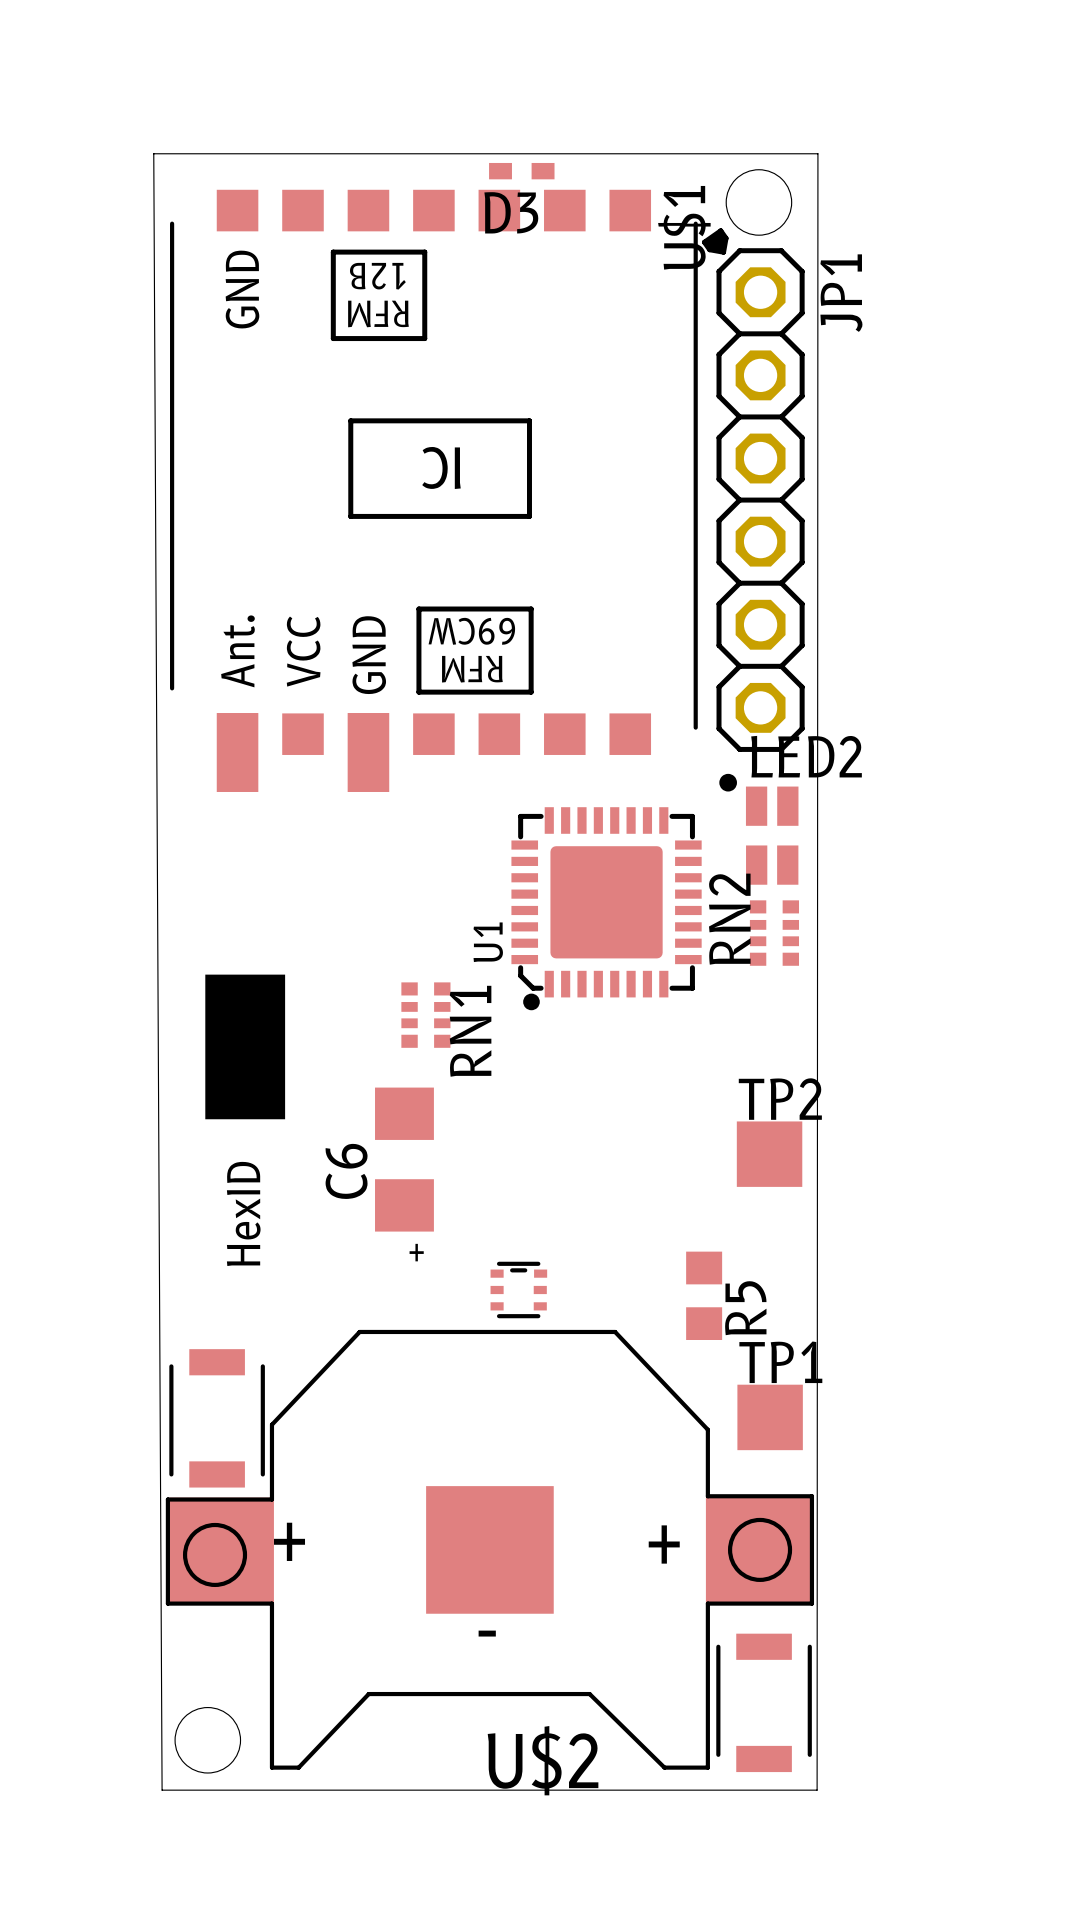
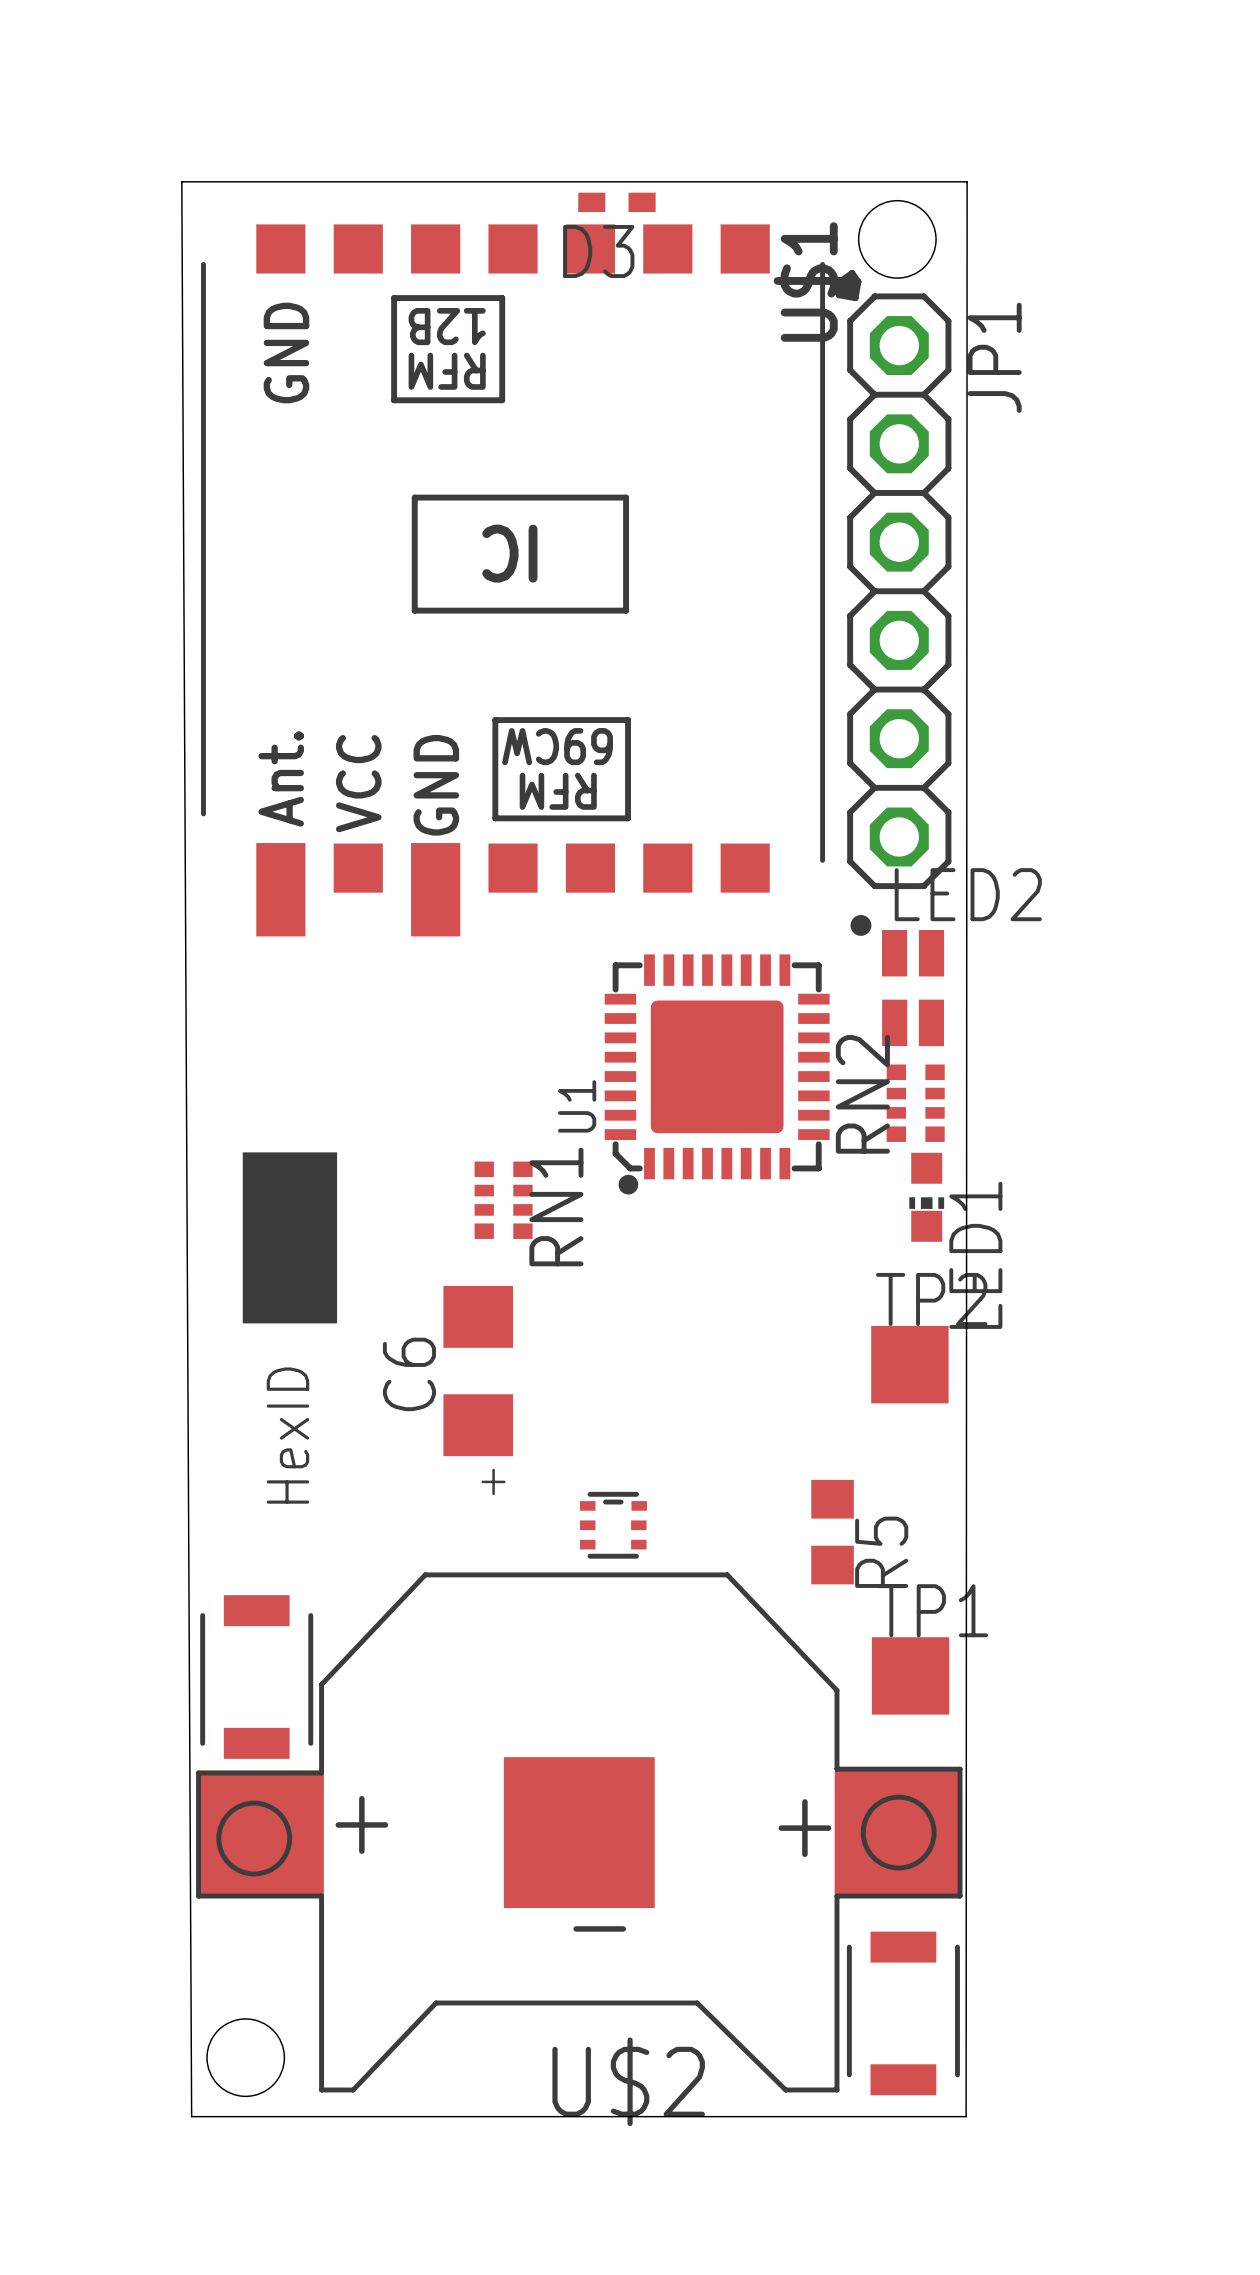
LED1: none -> (926, 1197)

